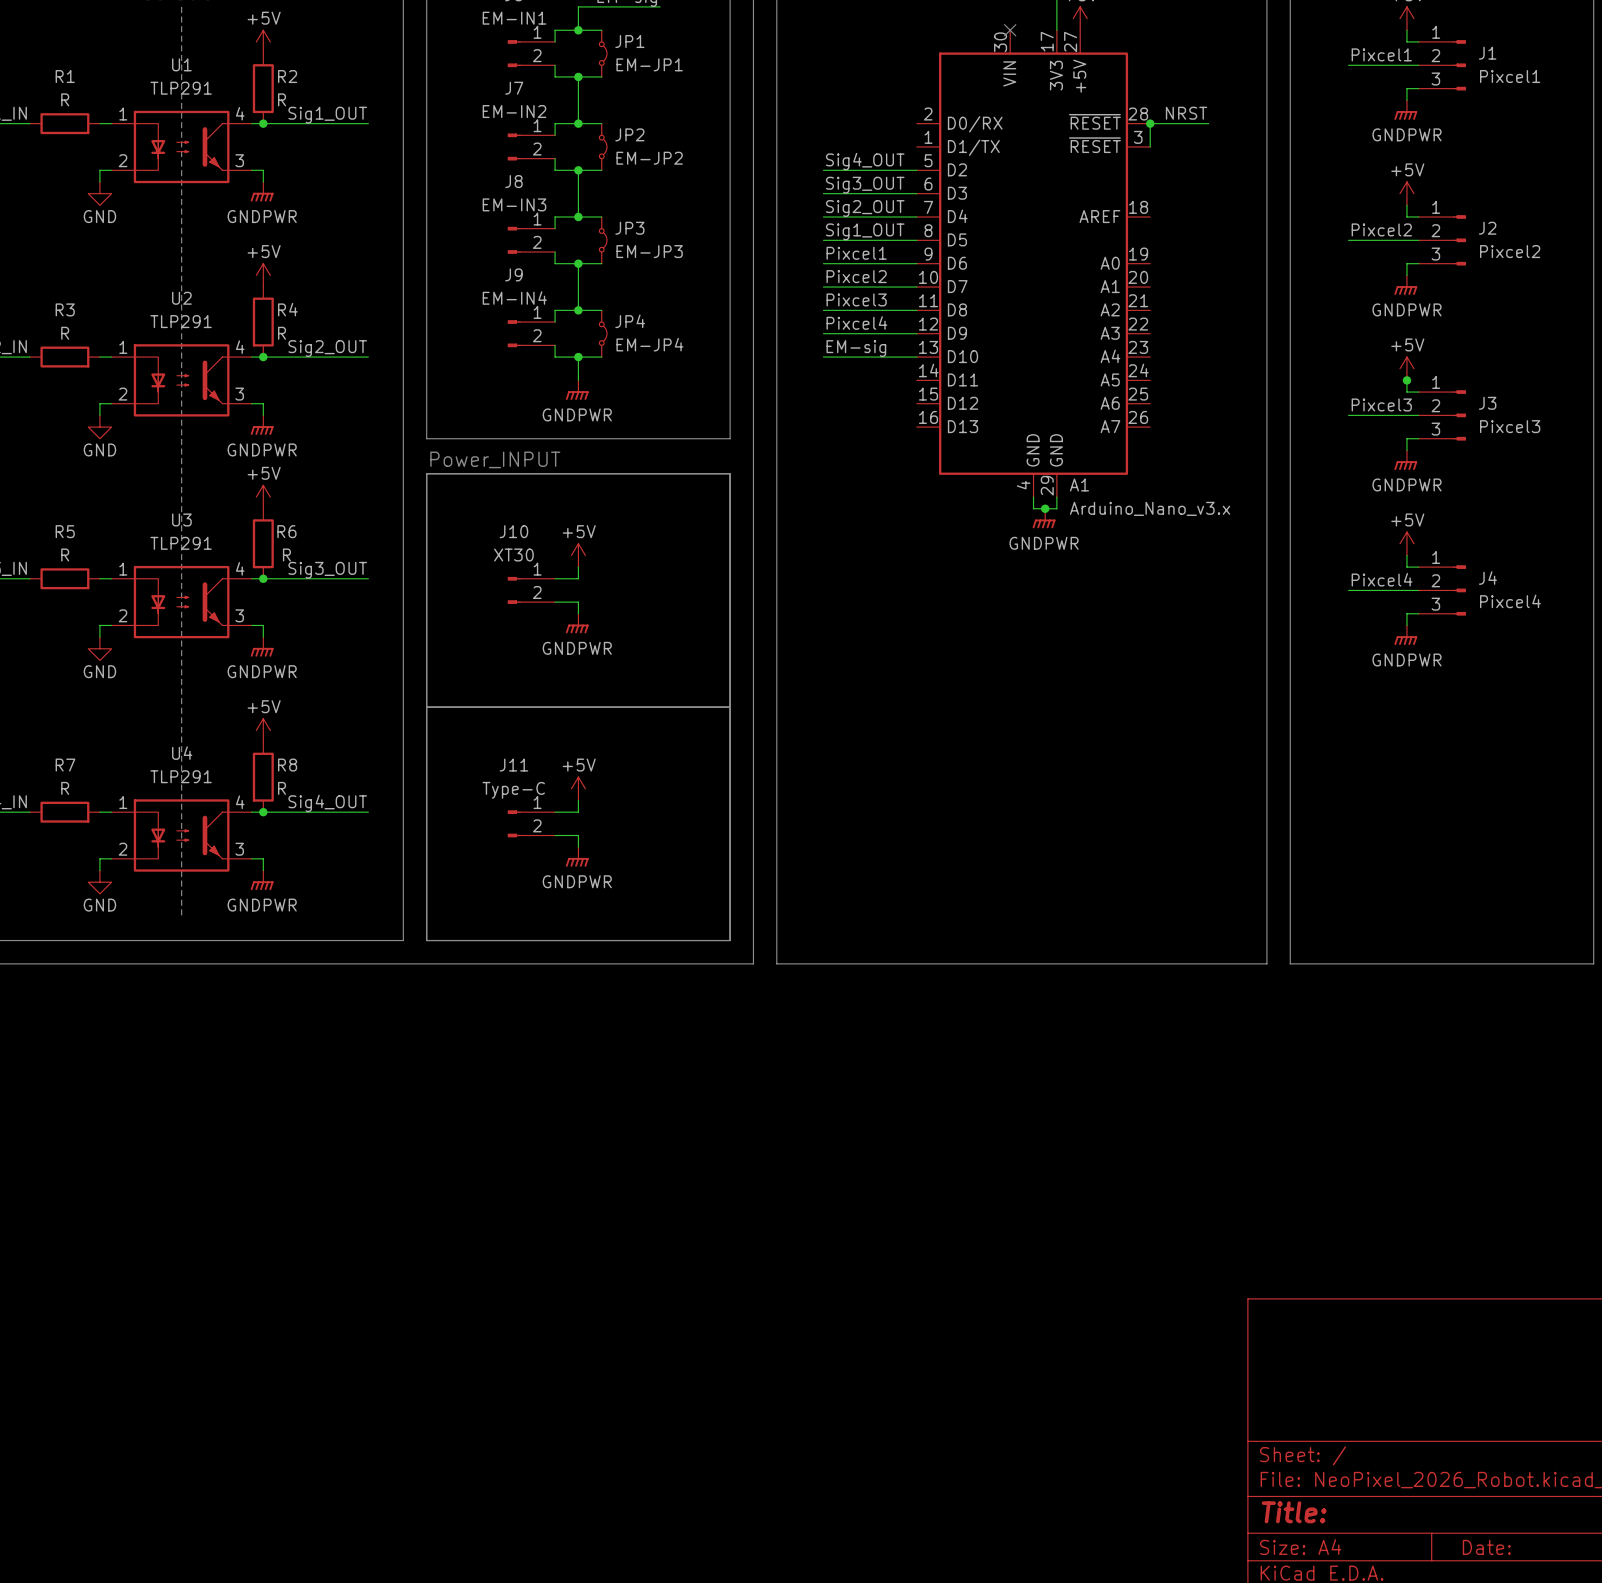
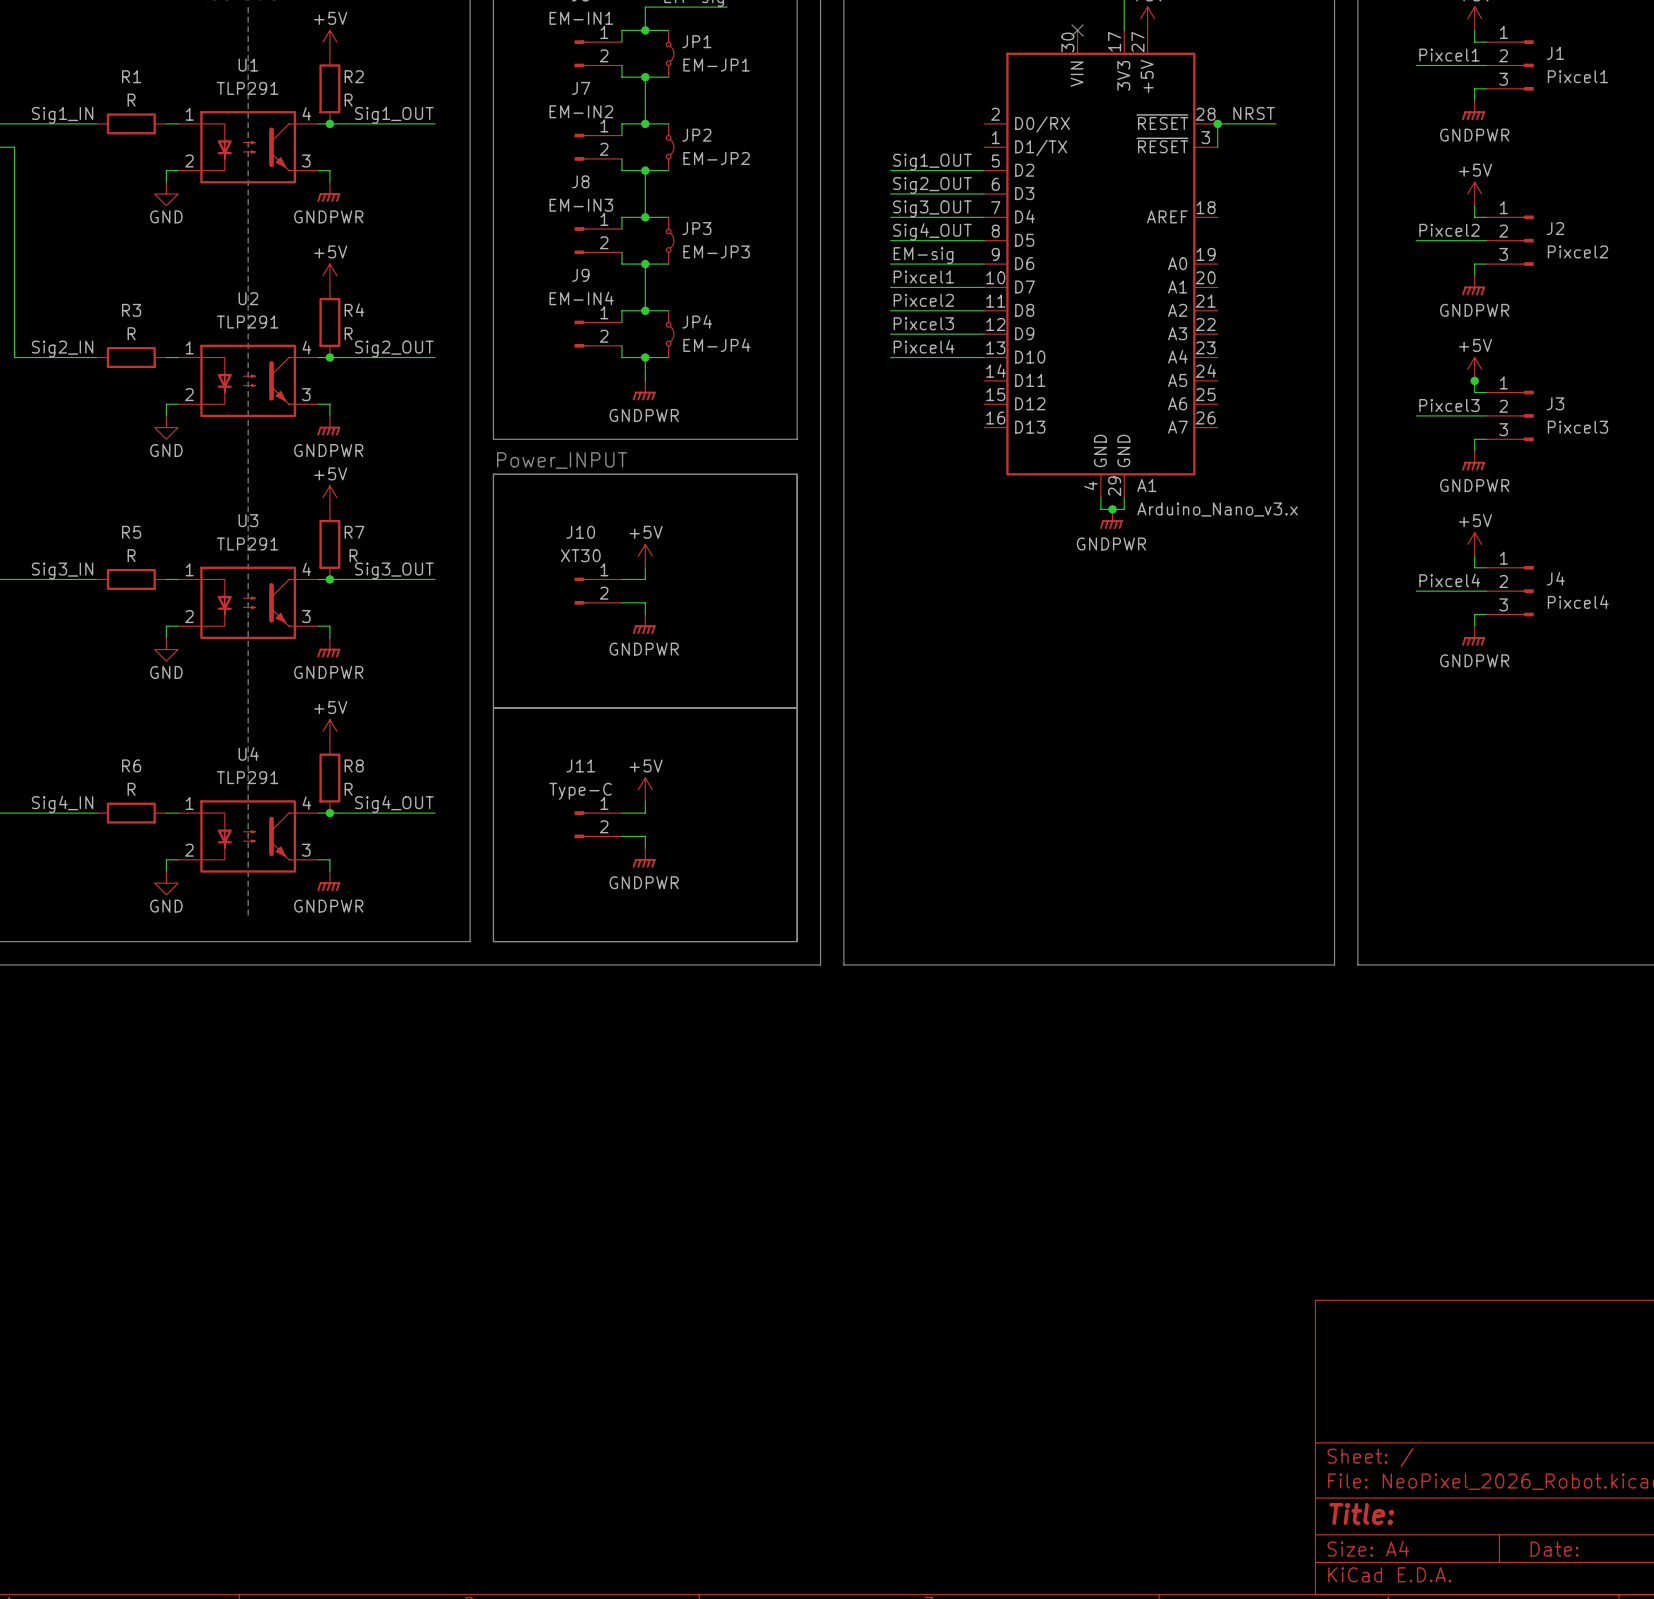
label: Sig4_OUT (865, 161) -> Sig1_OUT (932, 162)
label: Sig3_OUT (865, 185) -> Sig2_OUT (932, 185)
label: Sig2_OUT (865, 208) -> Sig3_OUT (932, 208)
label: Sig1_OUT (865, 231) -> Sig4_OUT (932, 231)
label: Pixcel1 (856, 253) -> EM-sig (923, 255)
label: Pixcel2 (856, 276) -> Pixcel1 (923, 277)
label: Pixcel3 (856, 299) -> Pixcel2 (923, 300)
label: Pixcel4 (856, 323) -> Pixcel3 (923, 323)
label: EM-sig (856, 348) -> Pixcel4 (924, 346)
R6 name: R6 (286, 531) -> R7 (354, 532)
R7 name: R7 (65, 765) -> R6 (131, 765)

